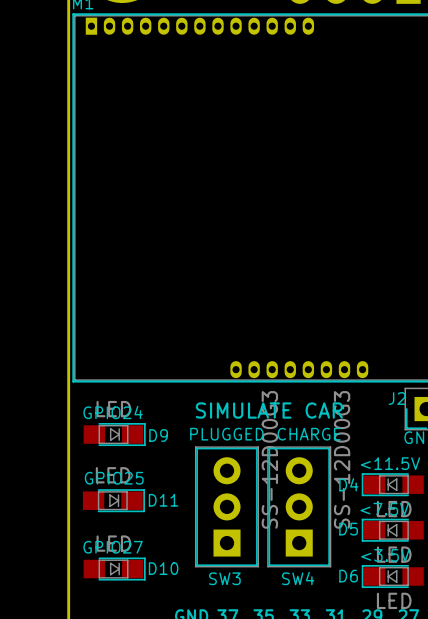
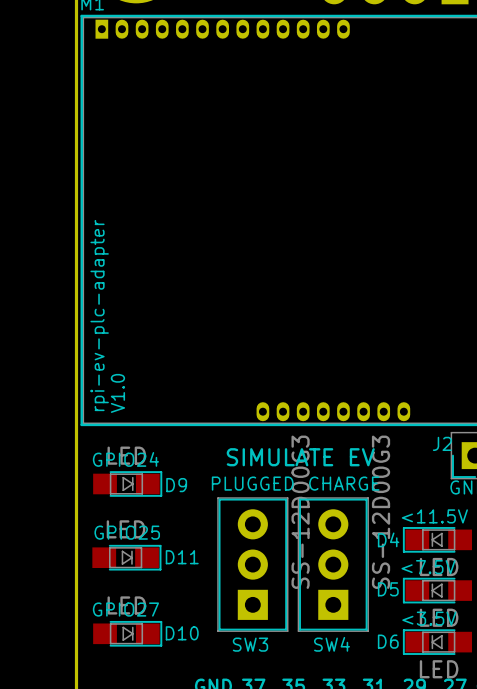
text: none -> rpi-ev-plc-adapter (99, 315)
text: none -> V1.0 (117, 393)
text: SIMULATE CAR (269, 410) -> SIMULATE EV (300, 457)

